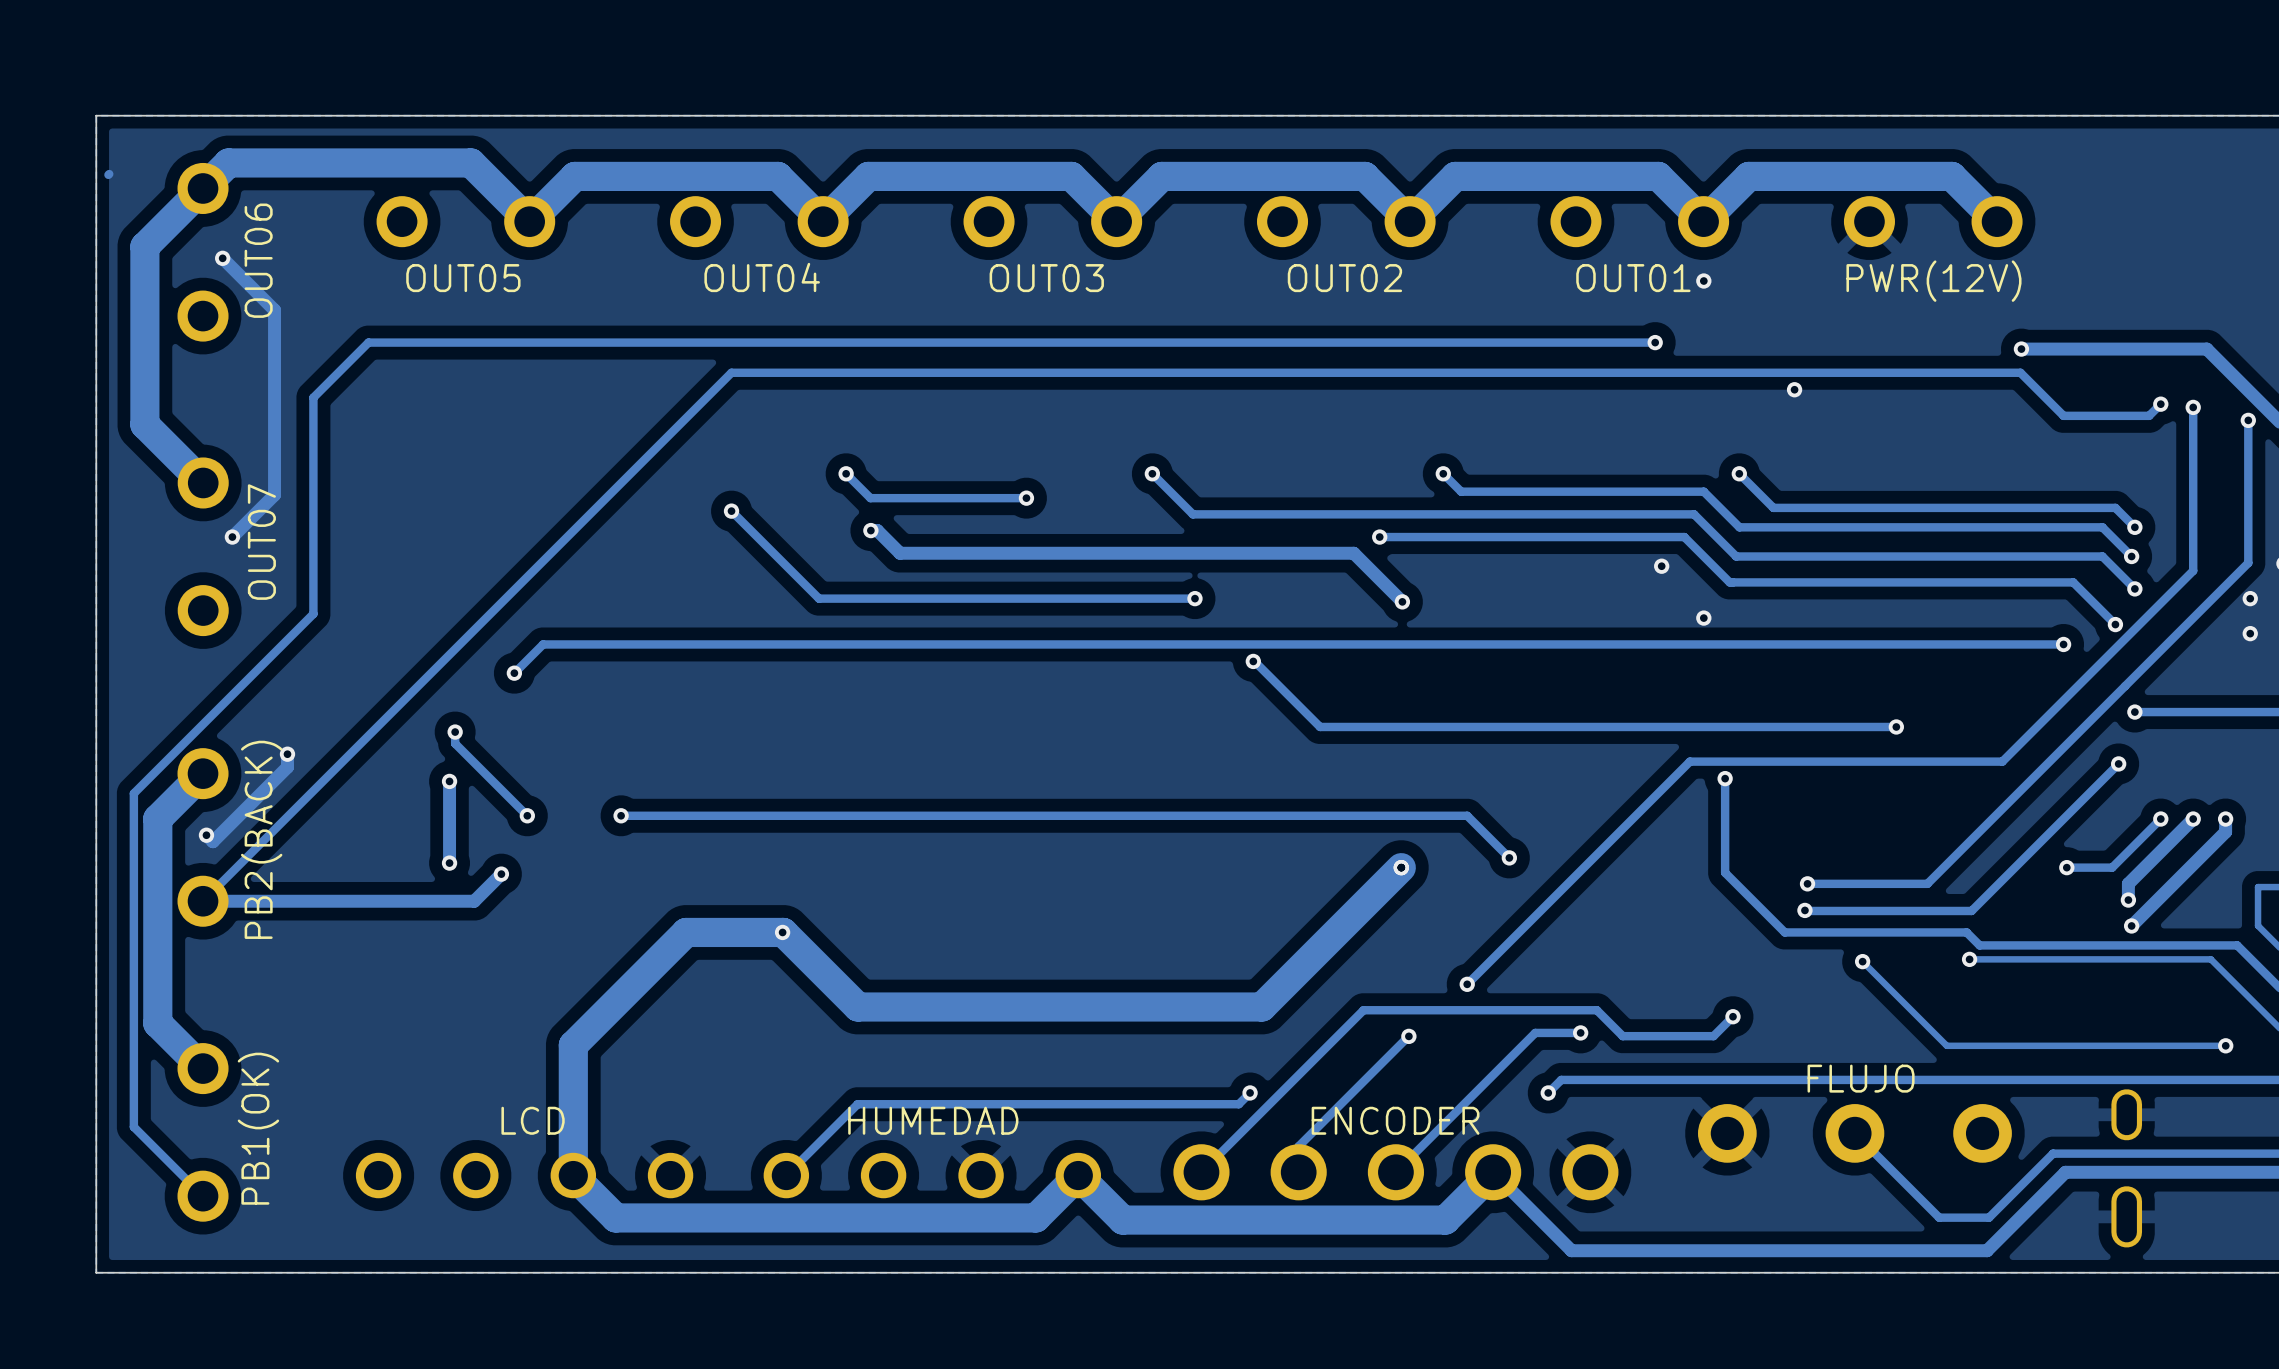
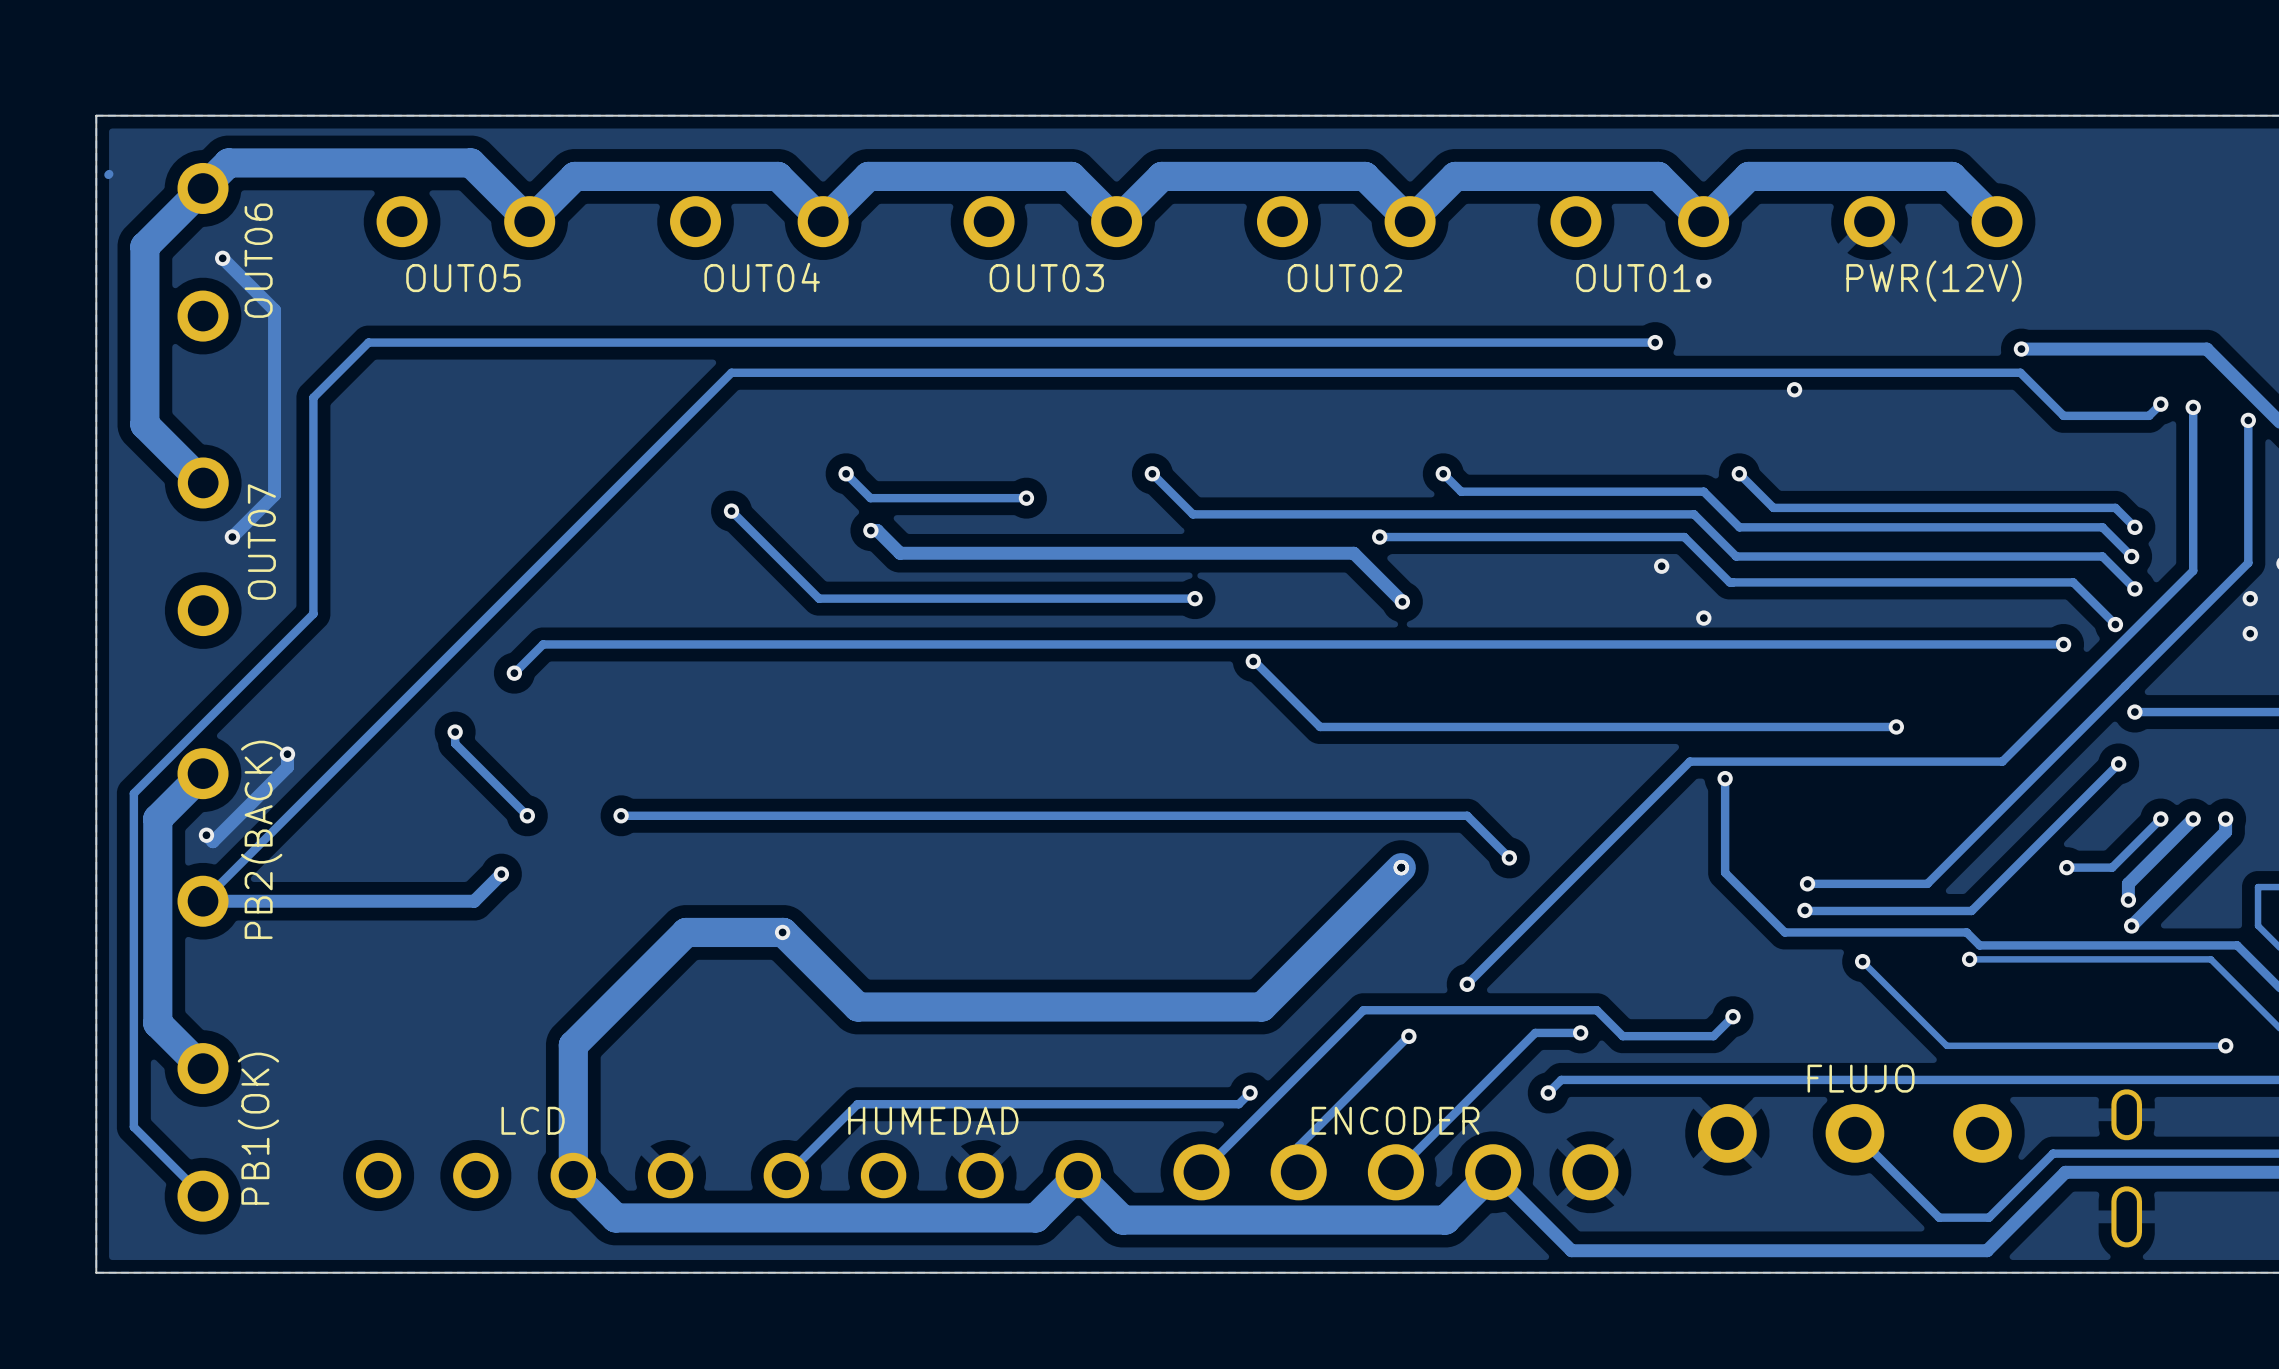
track: (449, 781) (449, 863) -> none
via: (449, 781) -> none
via: (449, 863) -> none

